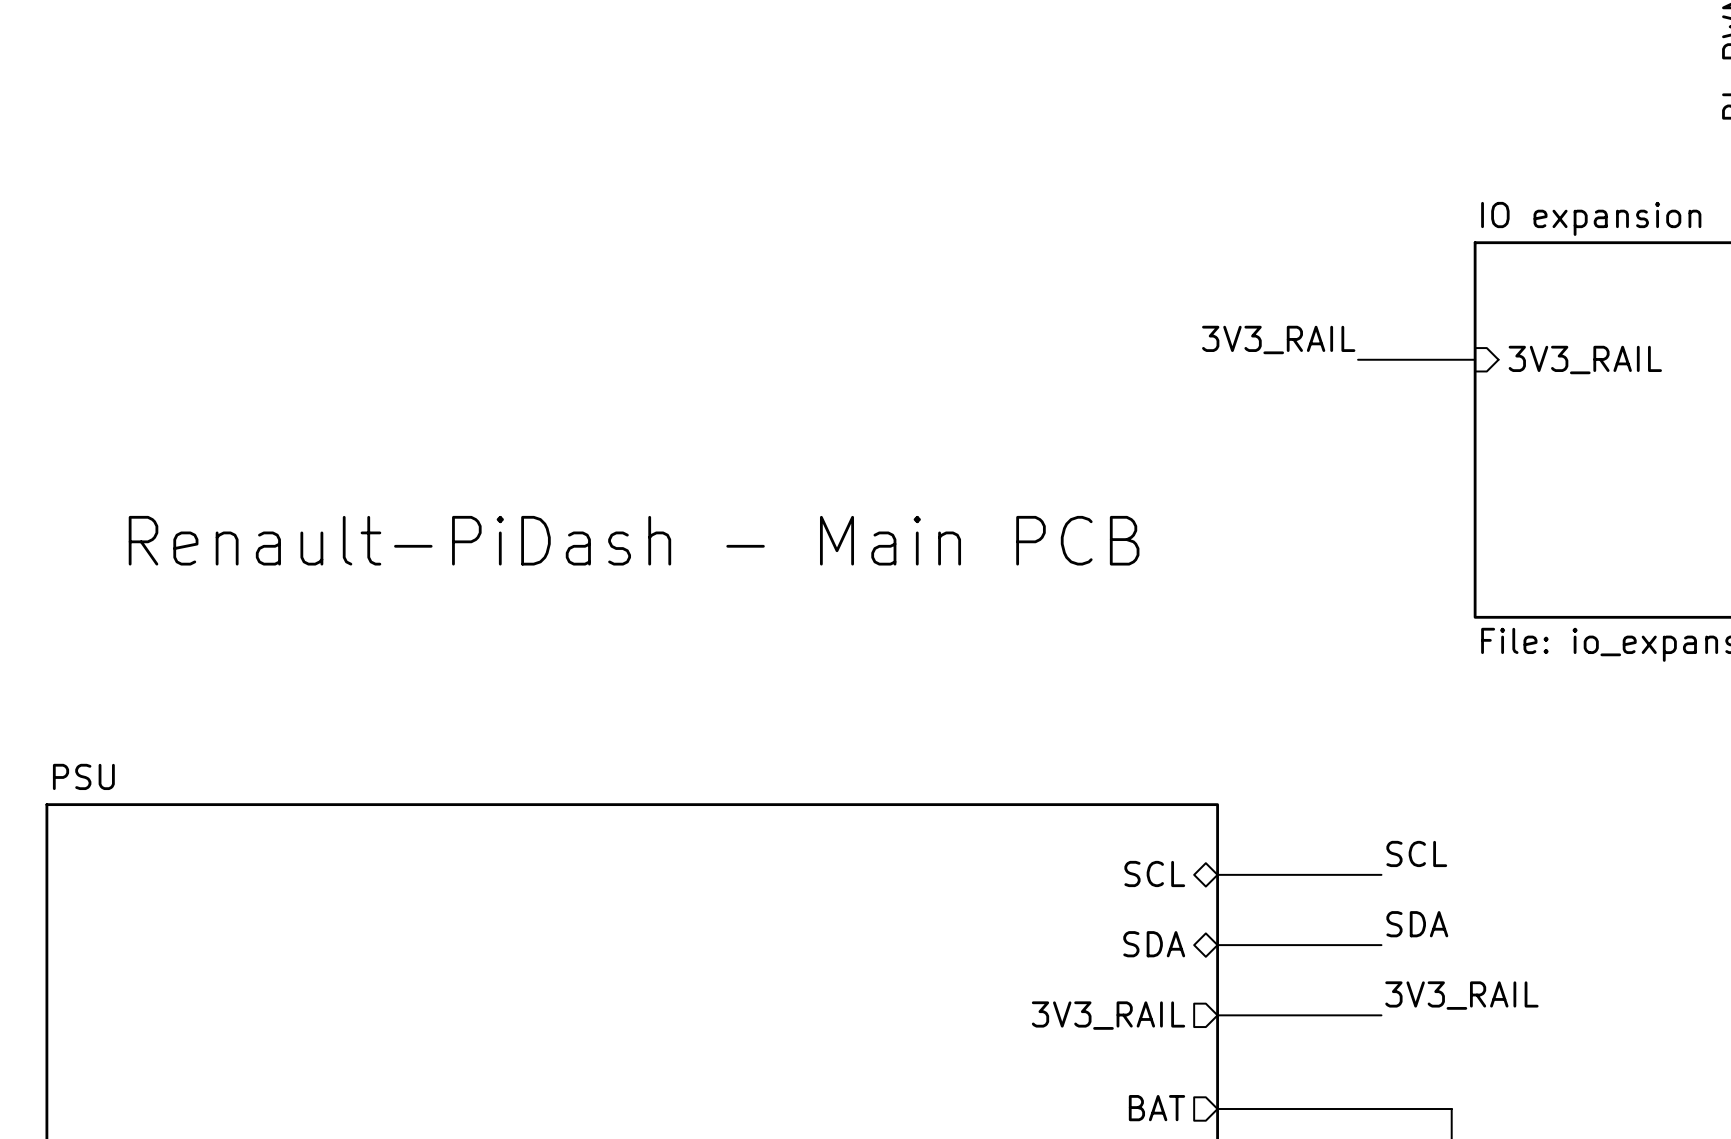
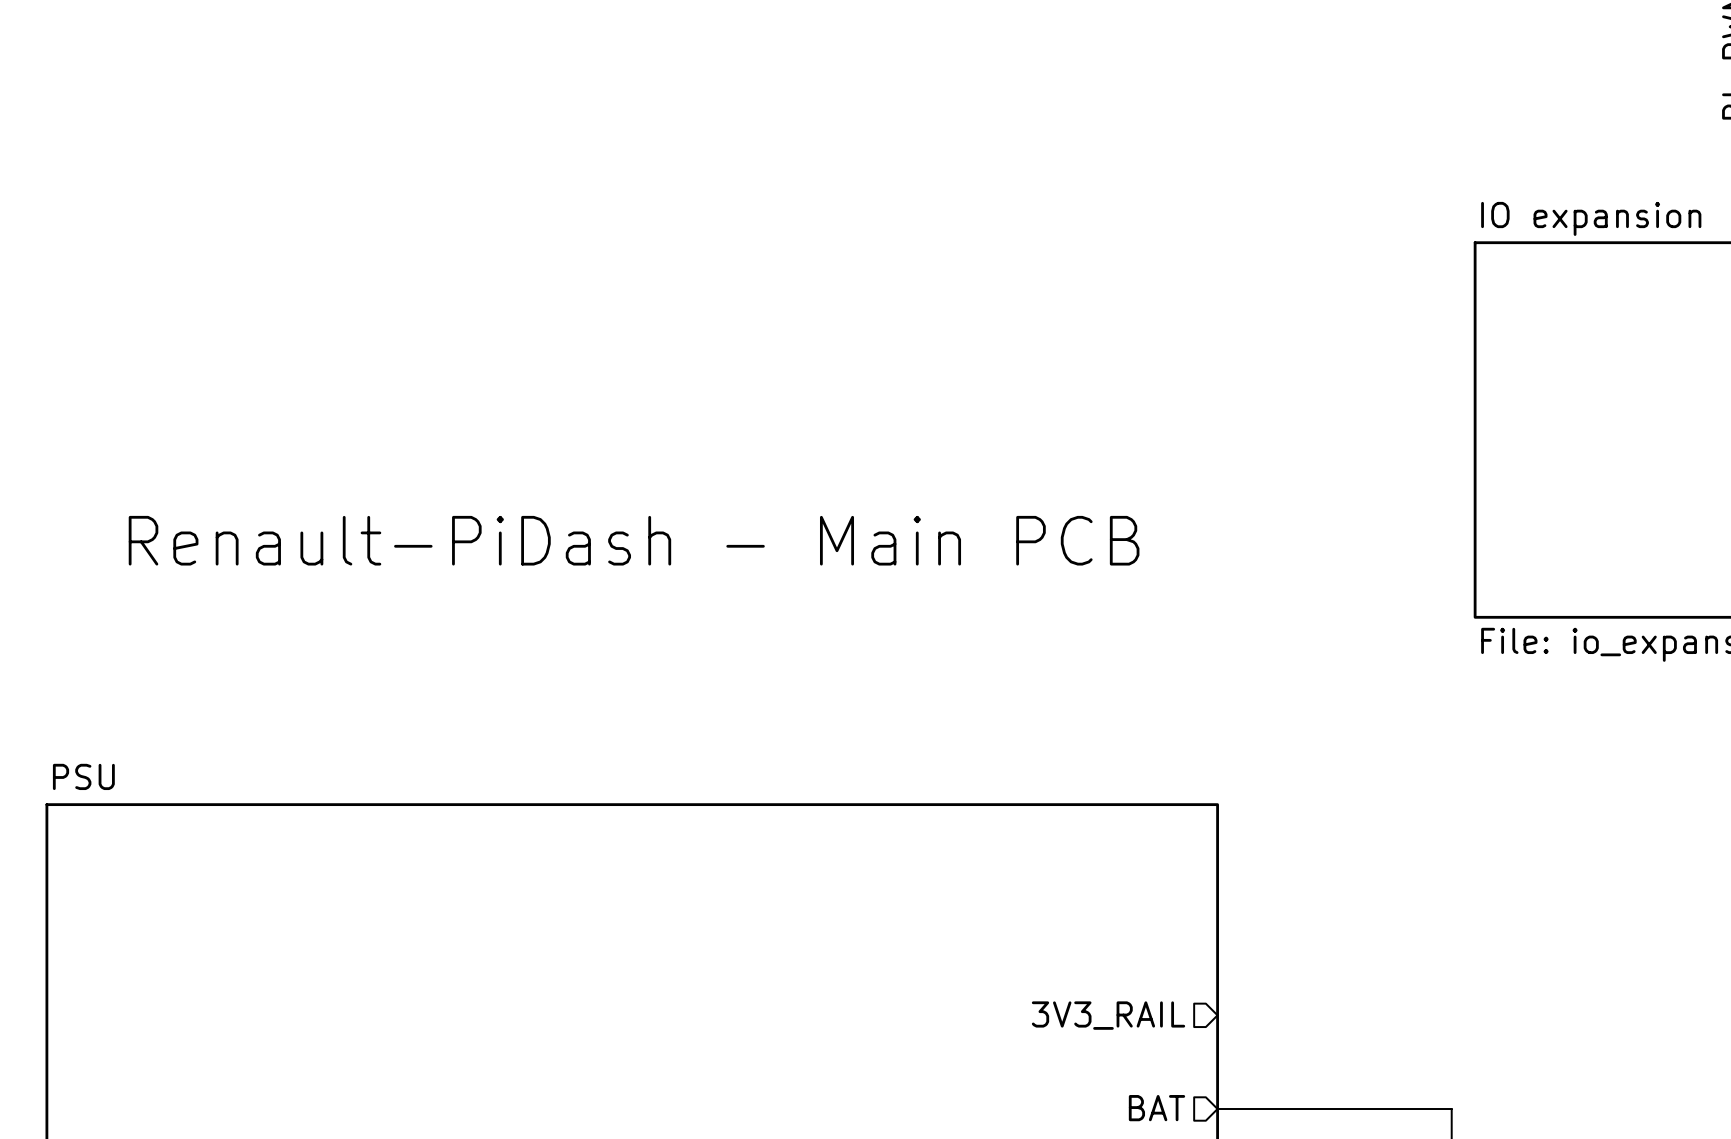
label: 3V3_RAIL (1278, 339) -> none
wire: (1358, 359) (1475, 359) -> none
sheet pin: 3V3_RAIL (1585, 360) -> none
label: SCL (1416, 853) -> none
sheet pin: SCL (1154, 873) -> none
wire: (1217, 874) (1381, 874) -> none
label: SDA (1417, 924) -> none
sheet pin: SDA (1154, 944) -> none
wire: (1217, 945) (1381, 945) -> none
label: 3V3_RAIL (1461, 995) -> none
wire: (1217, 1015) (1381, 1015) -> none

